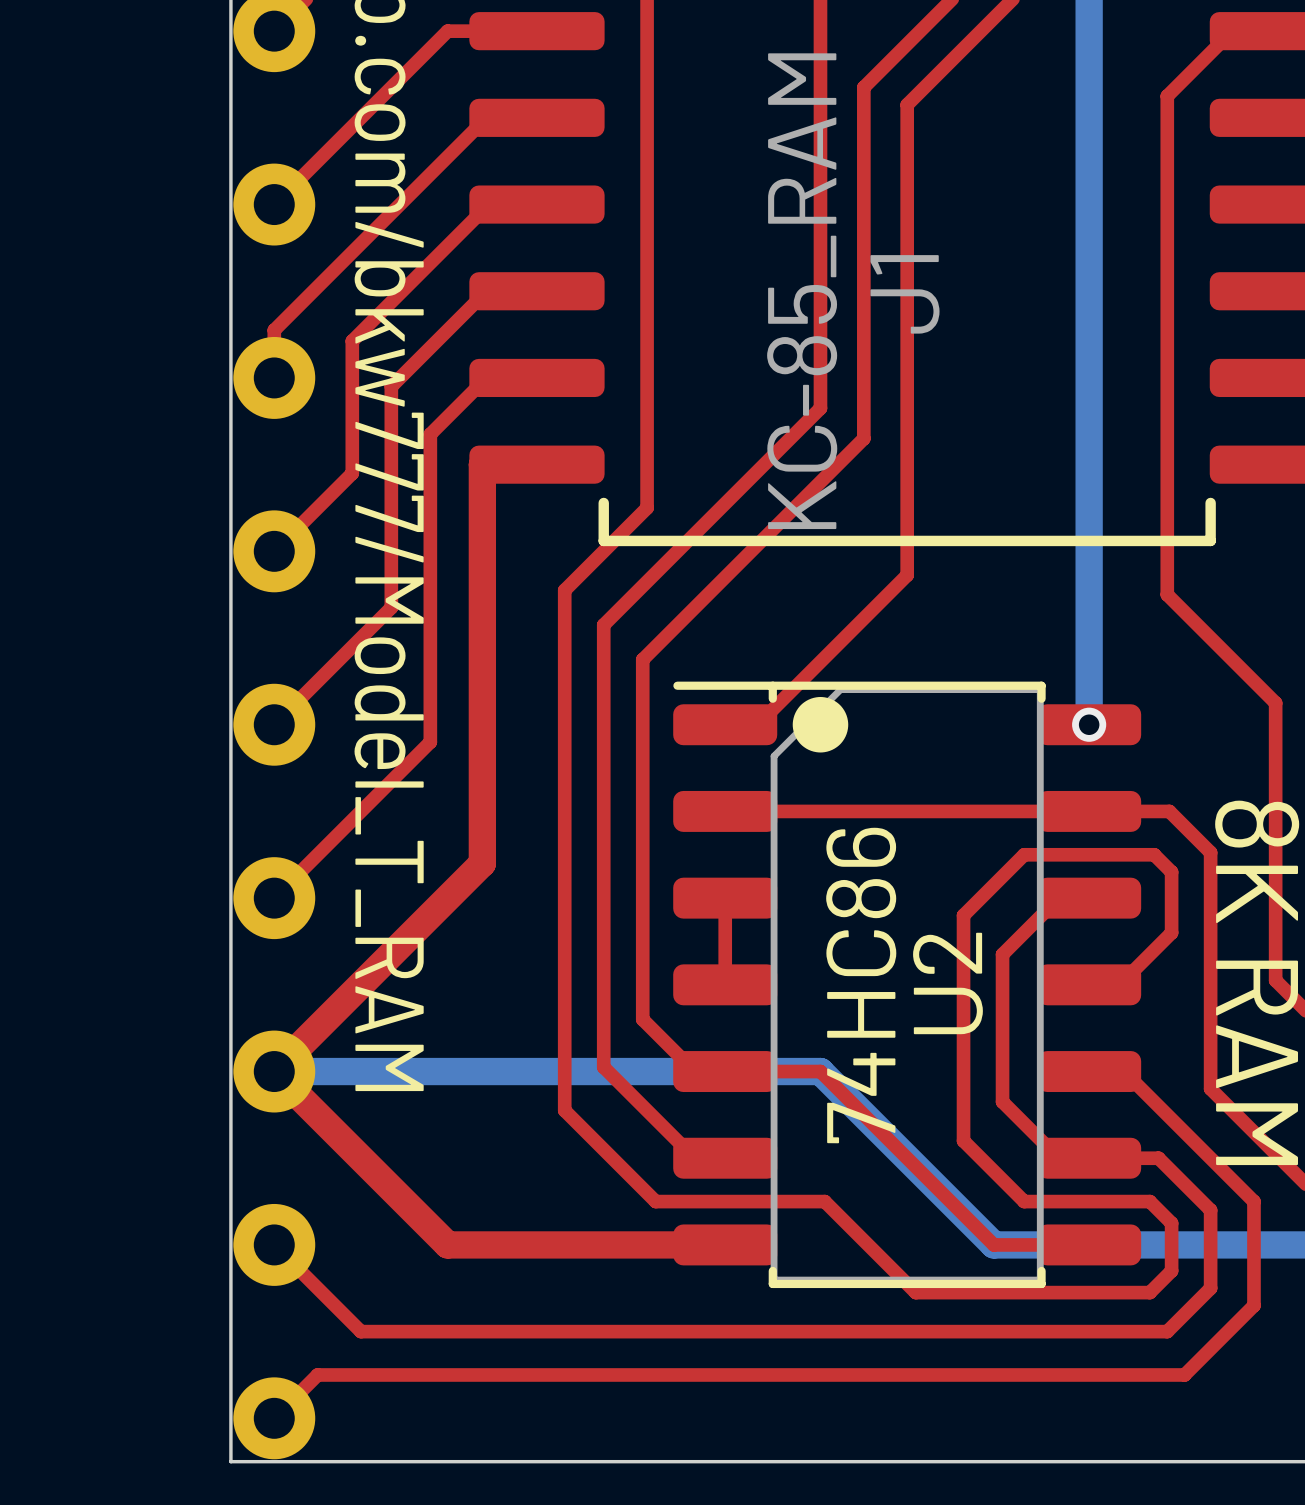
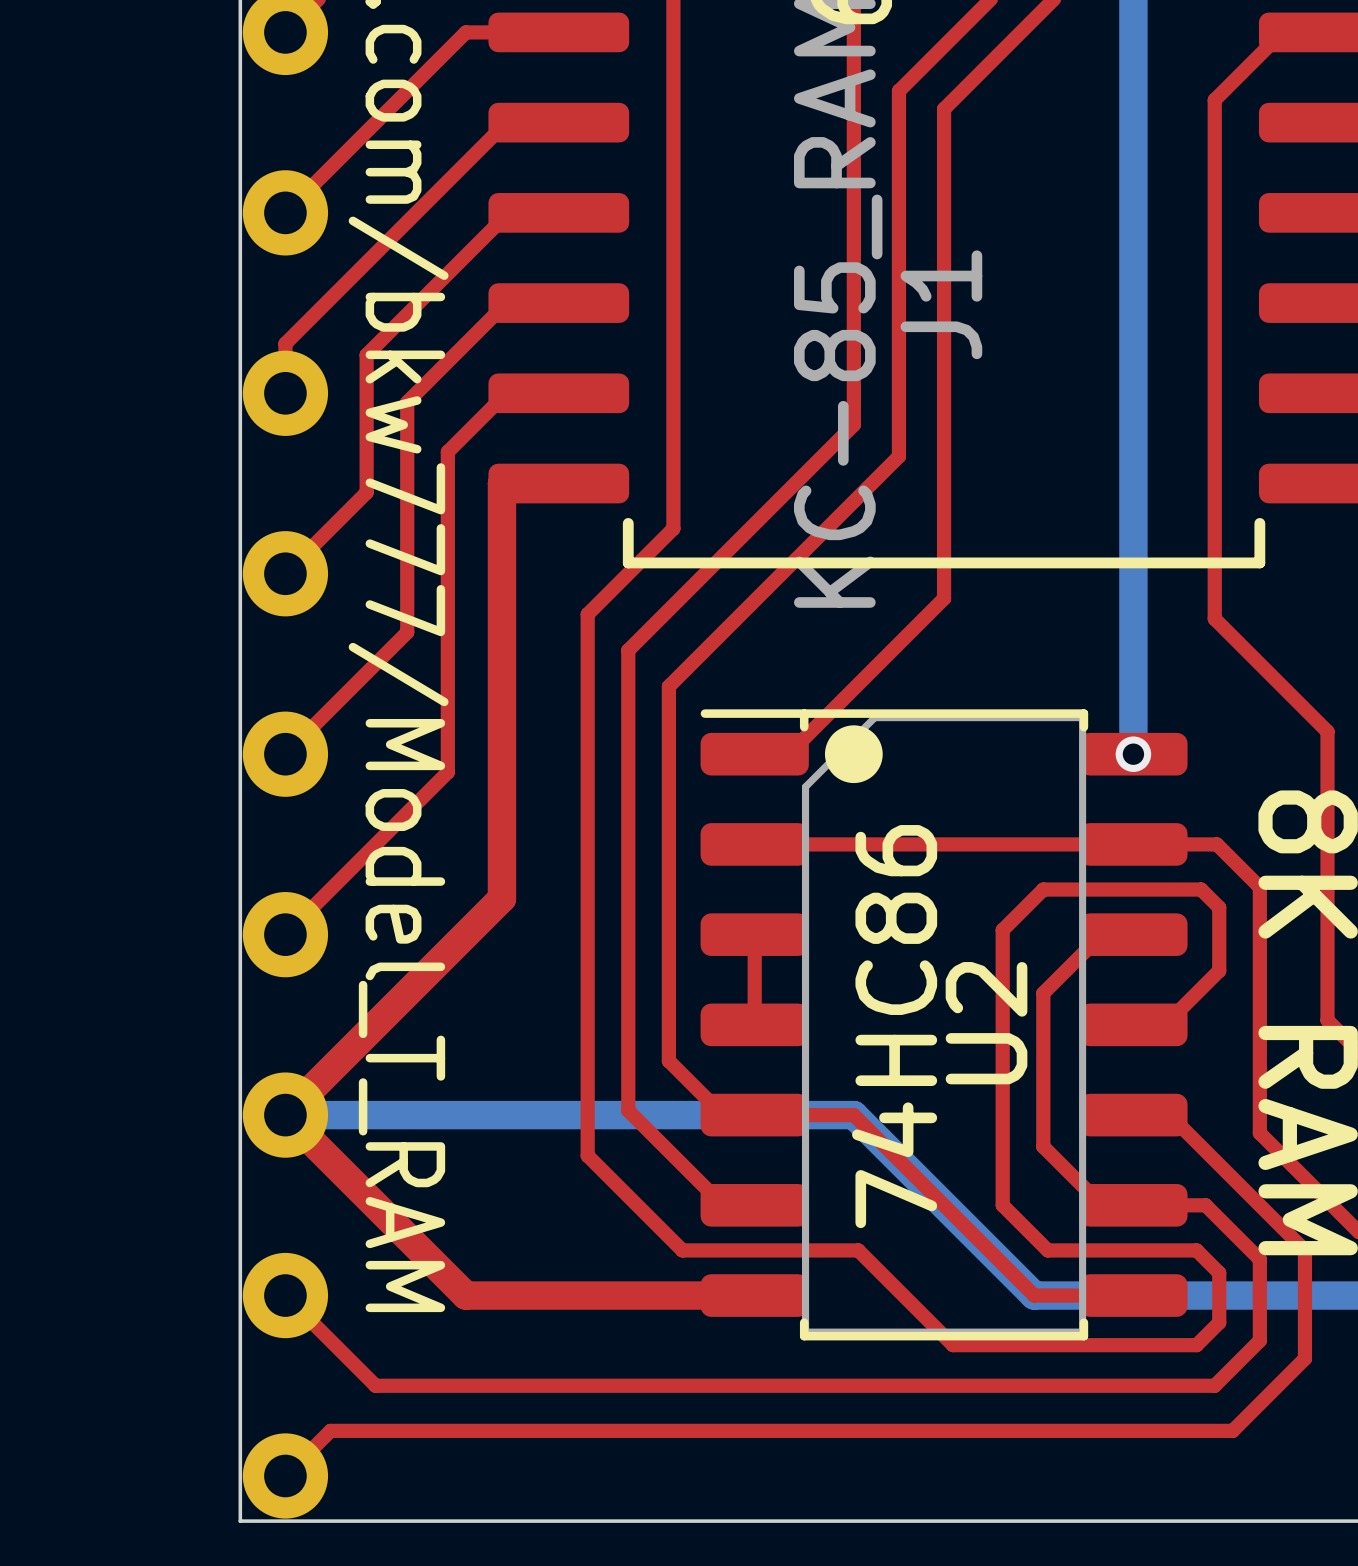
top track: (1024, 854) (963, 915) -> (1065, 889) (1043, 889) (1002, 930) (1002, 952)
top track: (963, 1140) (1024, 1201) -> (1002, 1187) (1002, 1205) (1047, 1250) (1065, 1250)

